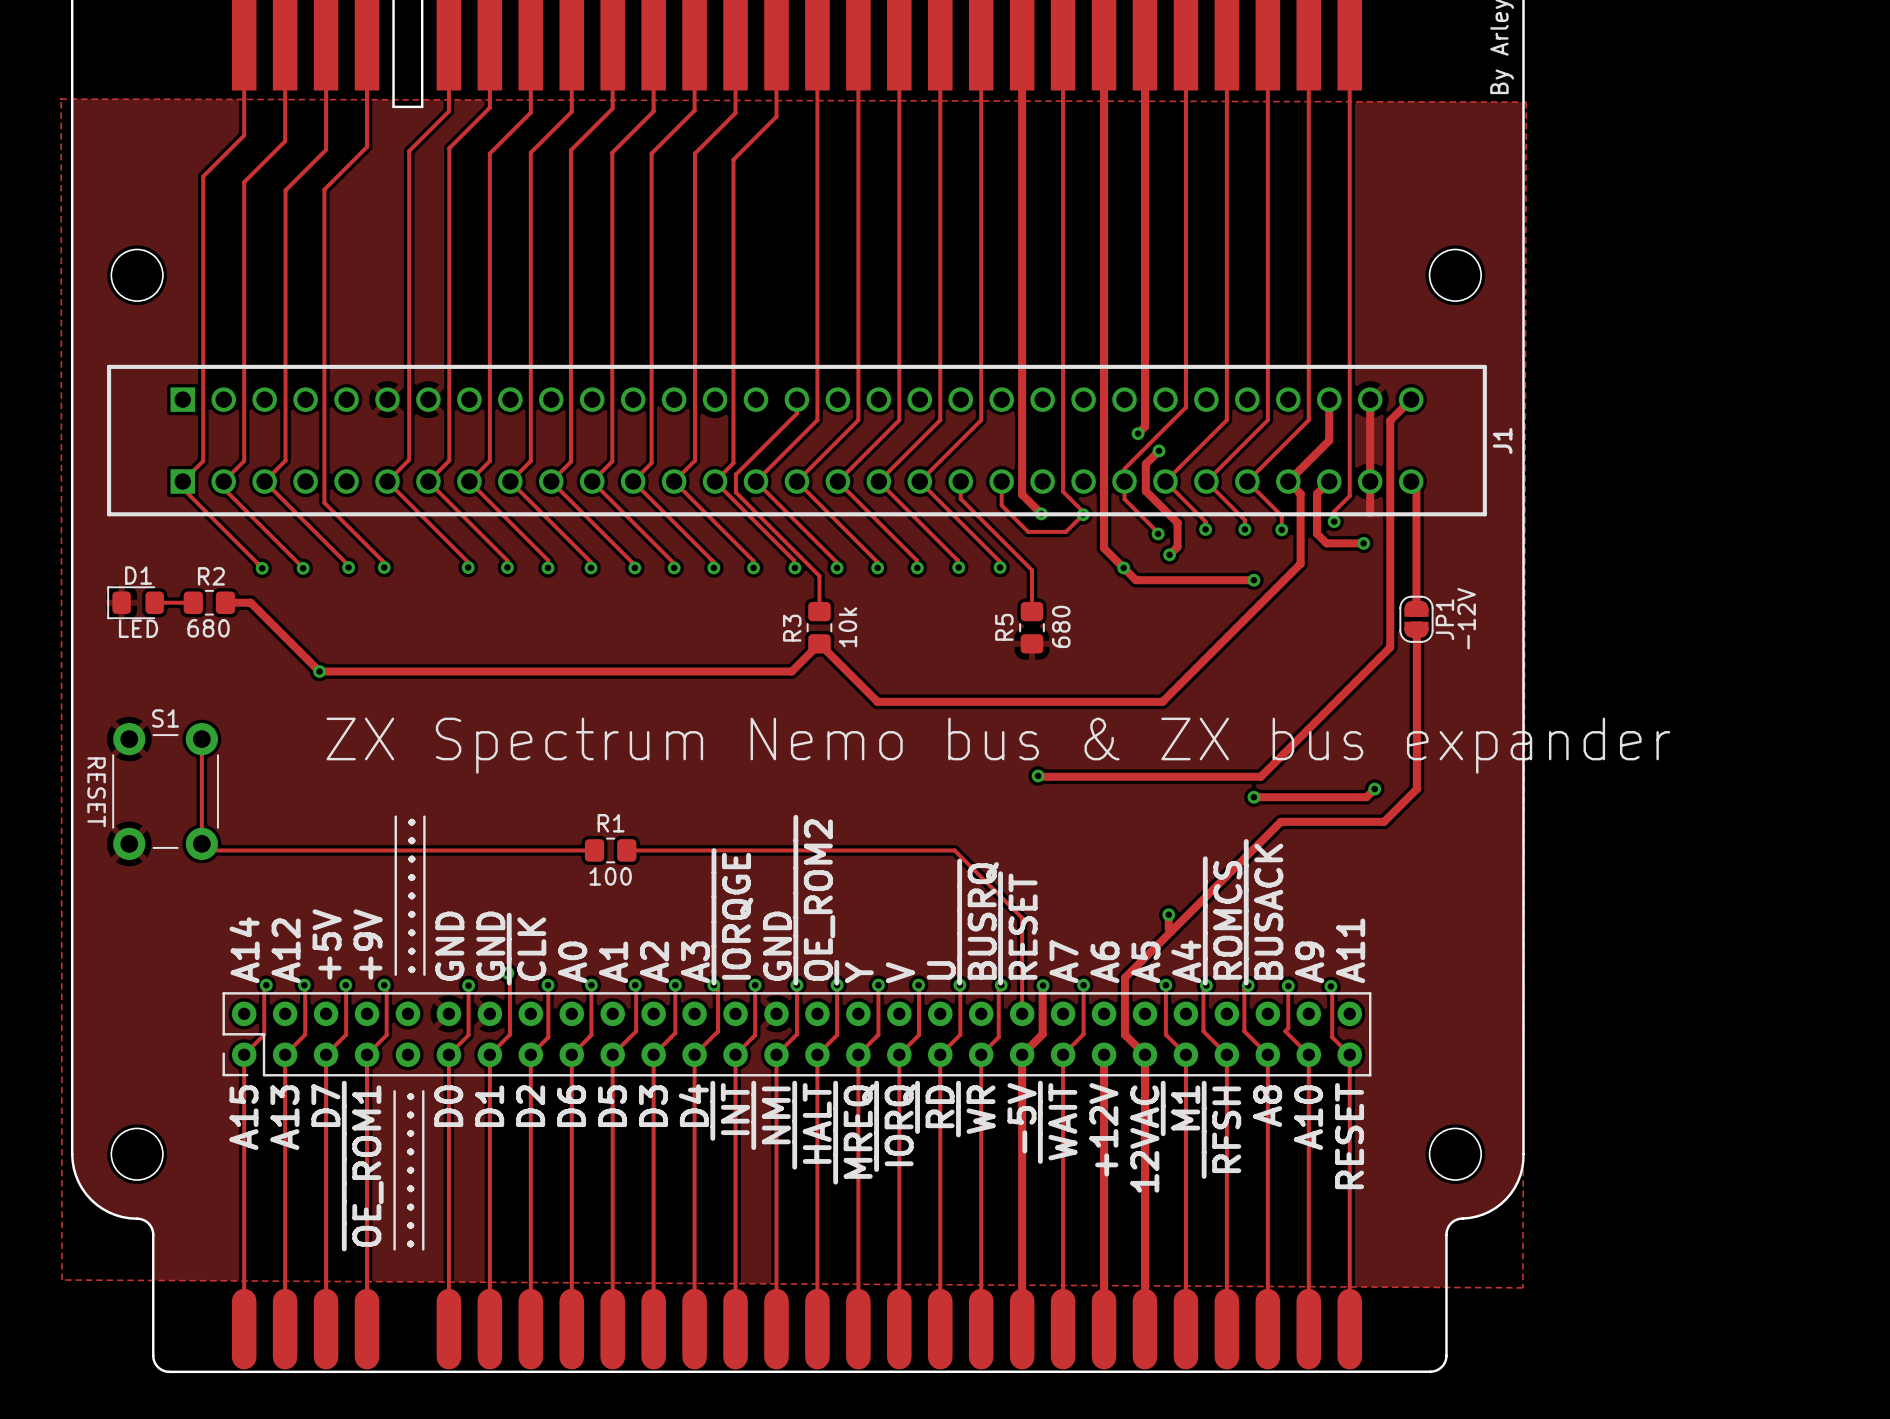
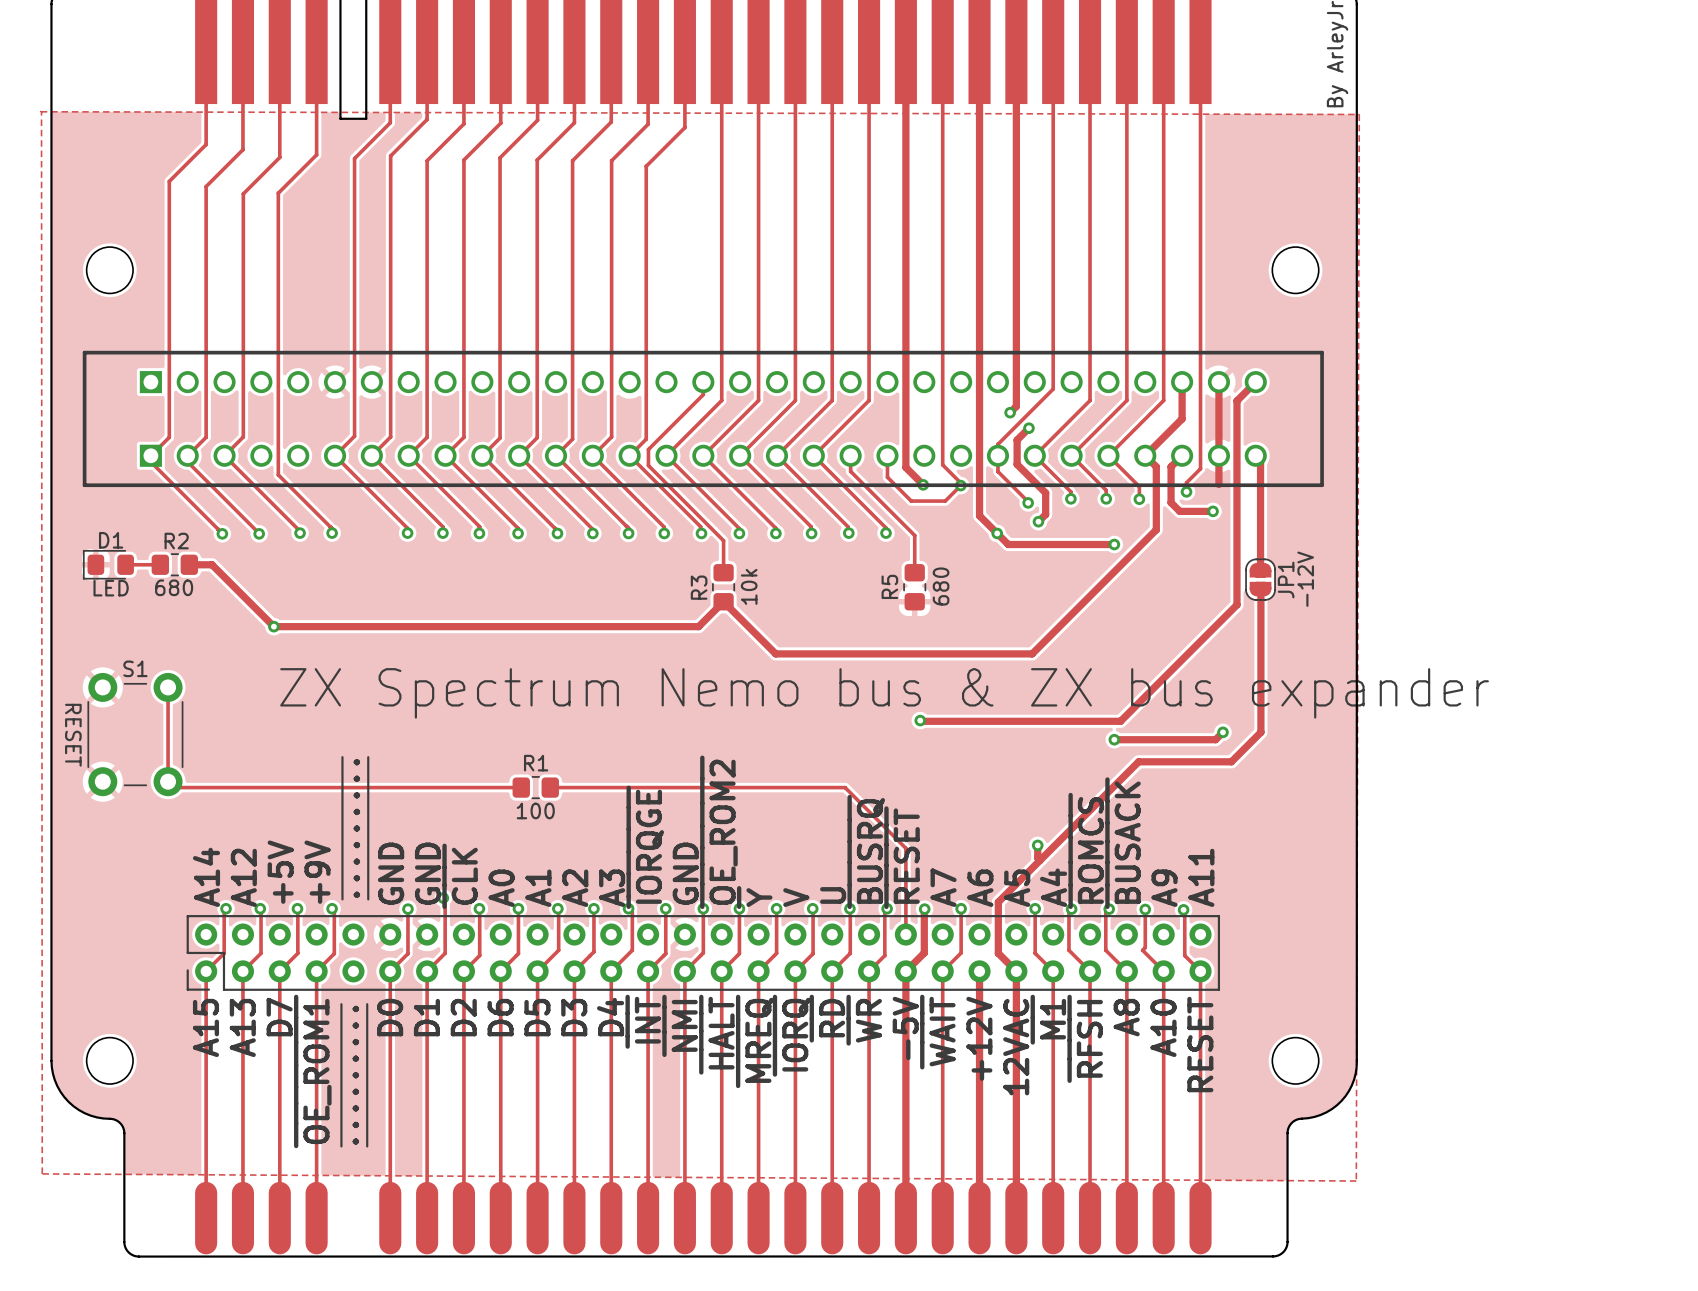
J1 name: J1 (1502, 440) -> none

